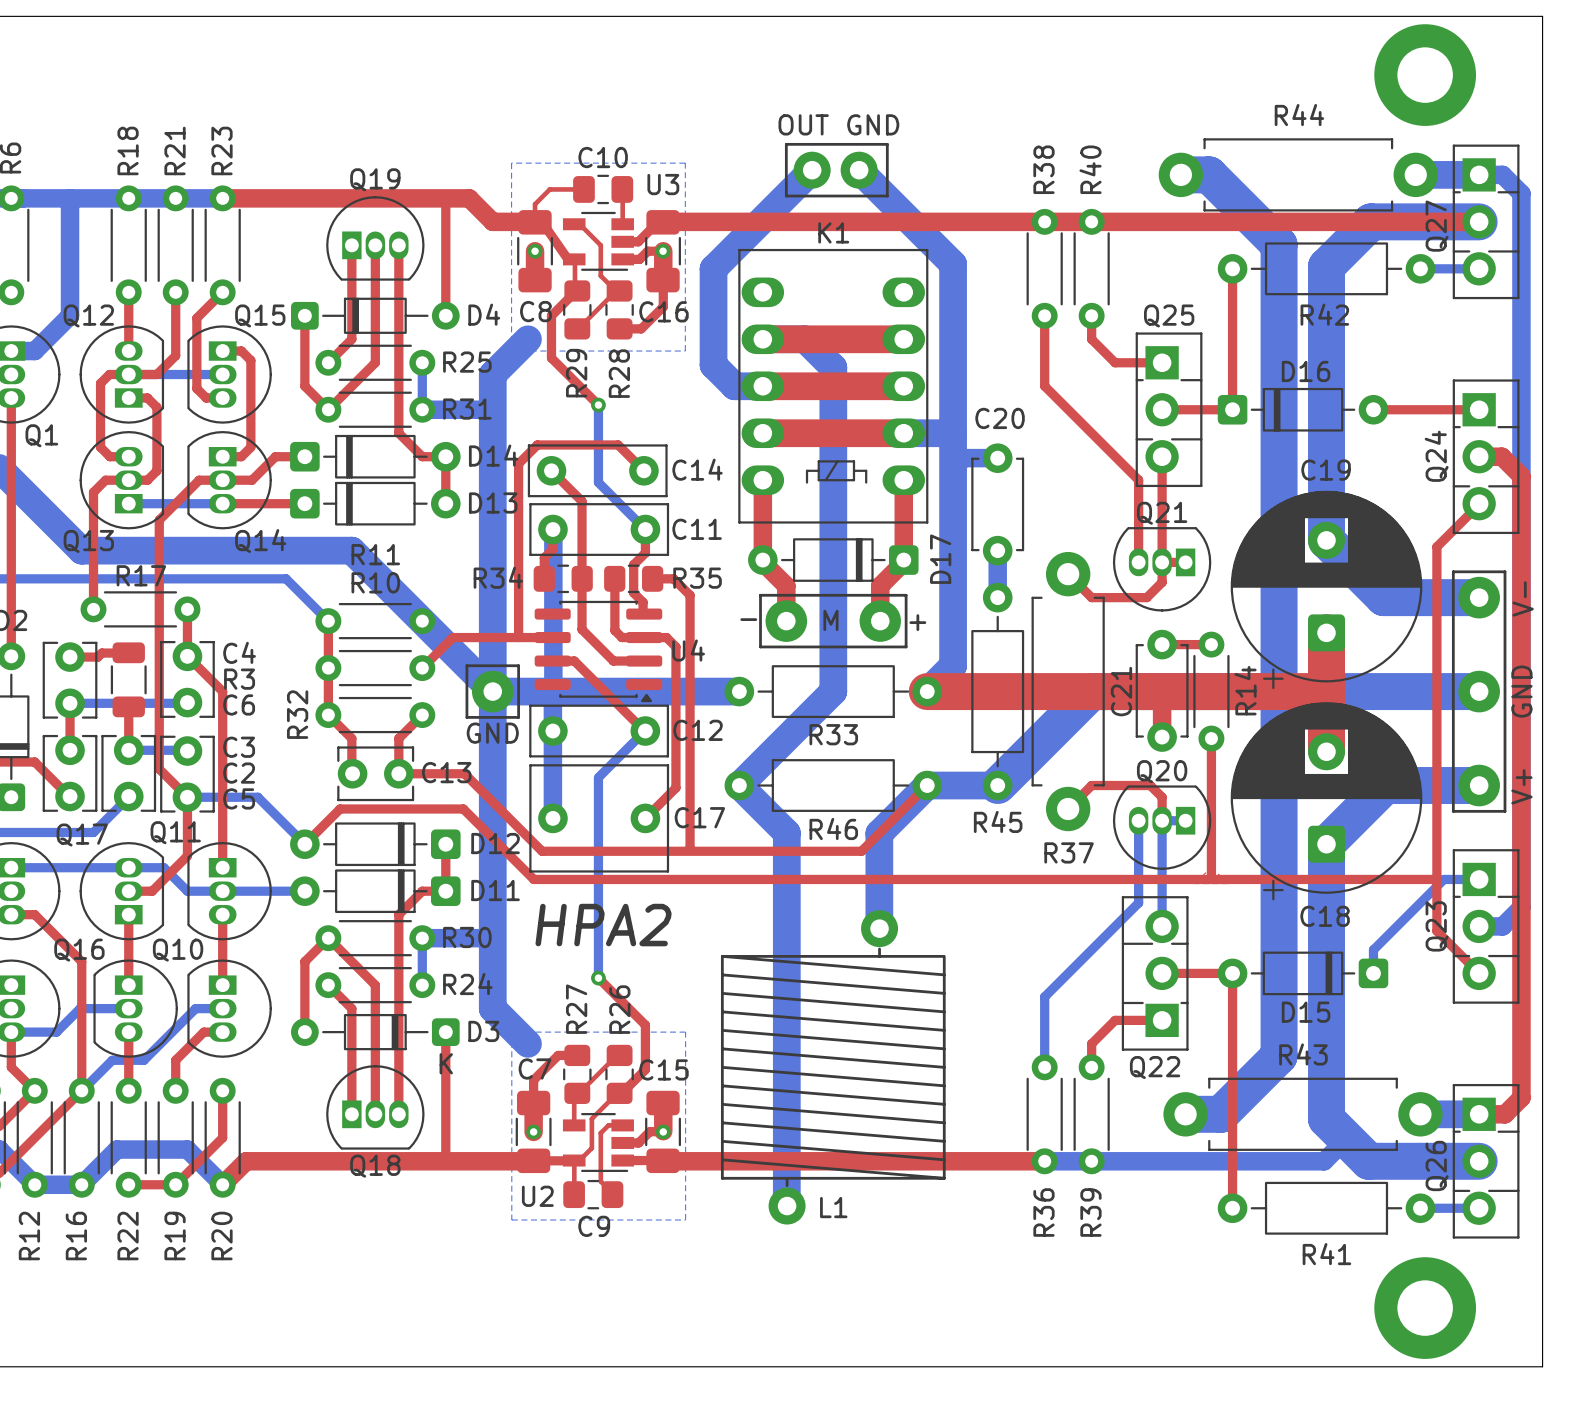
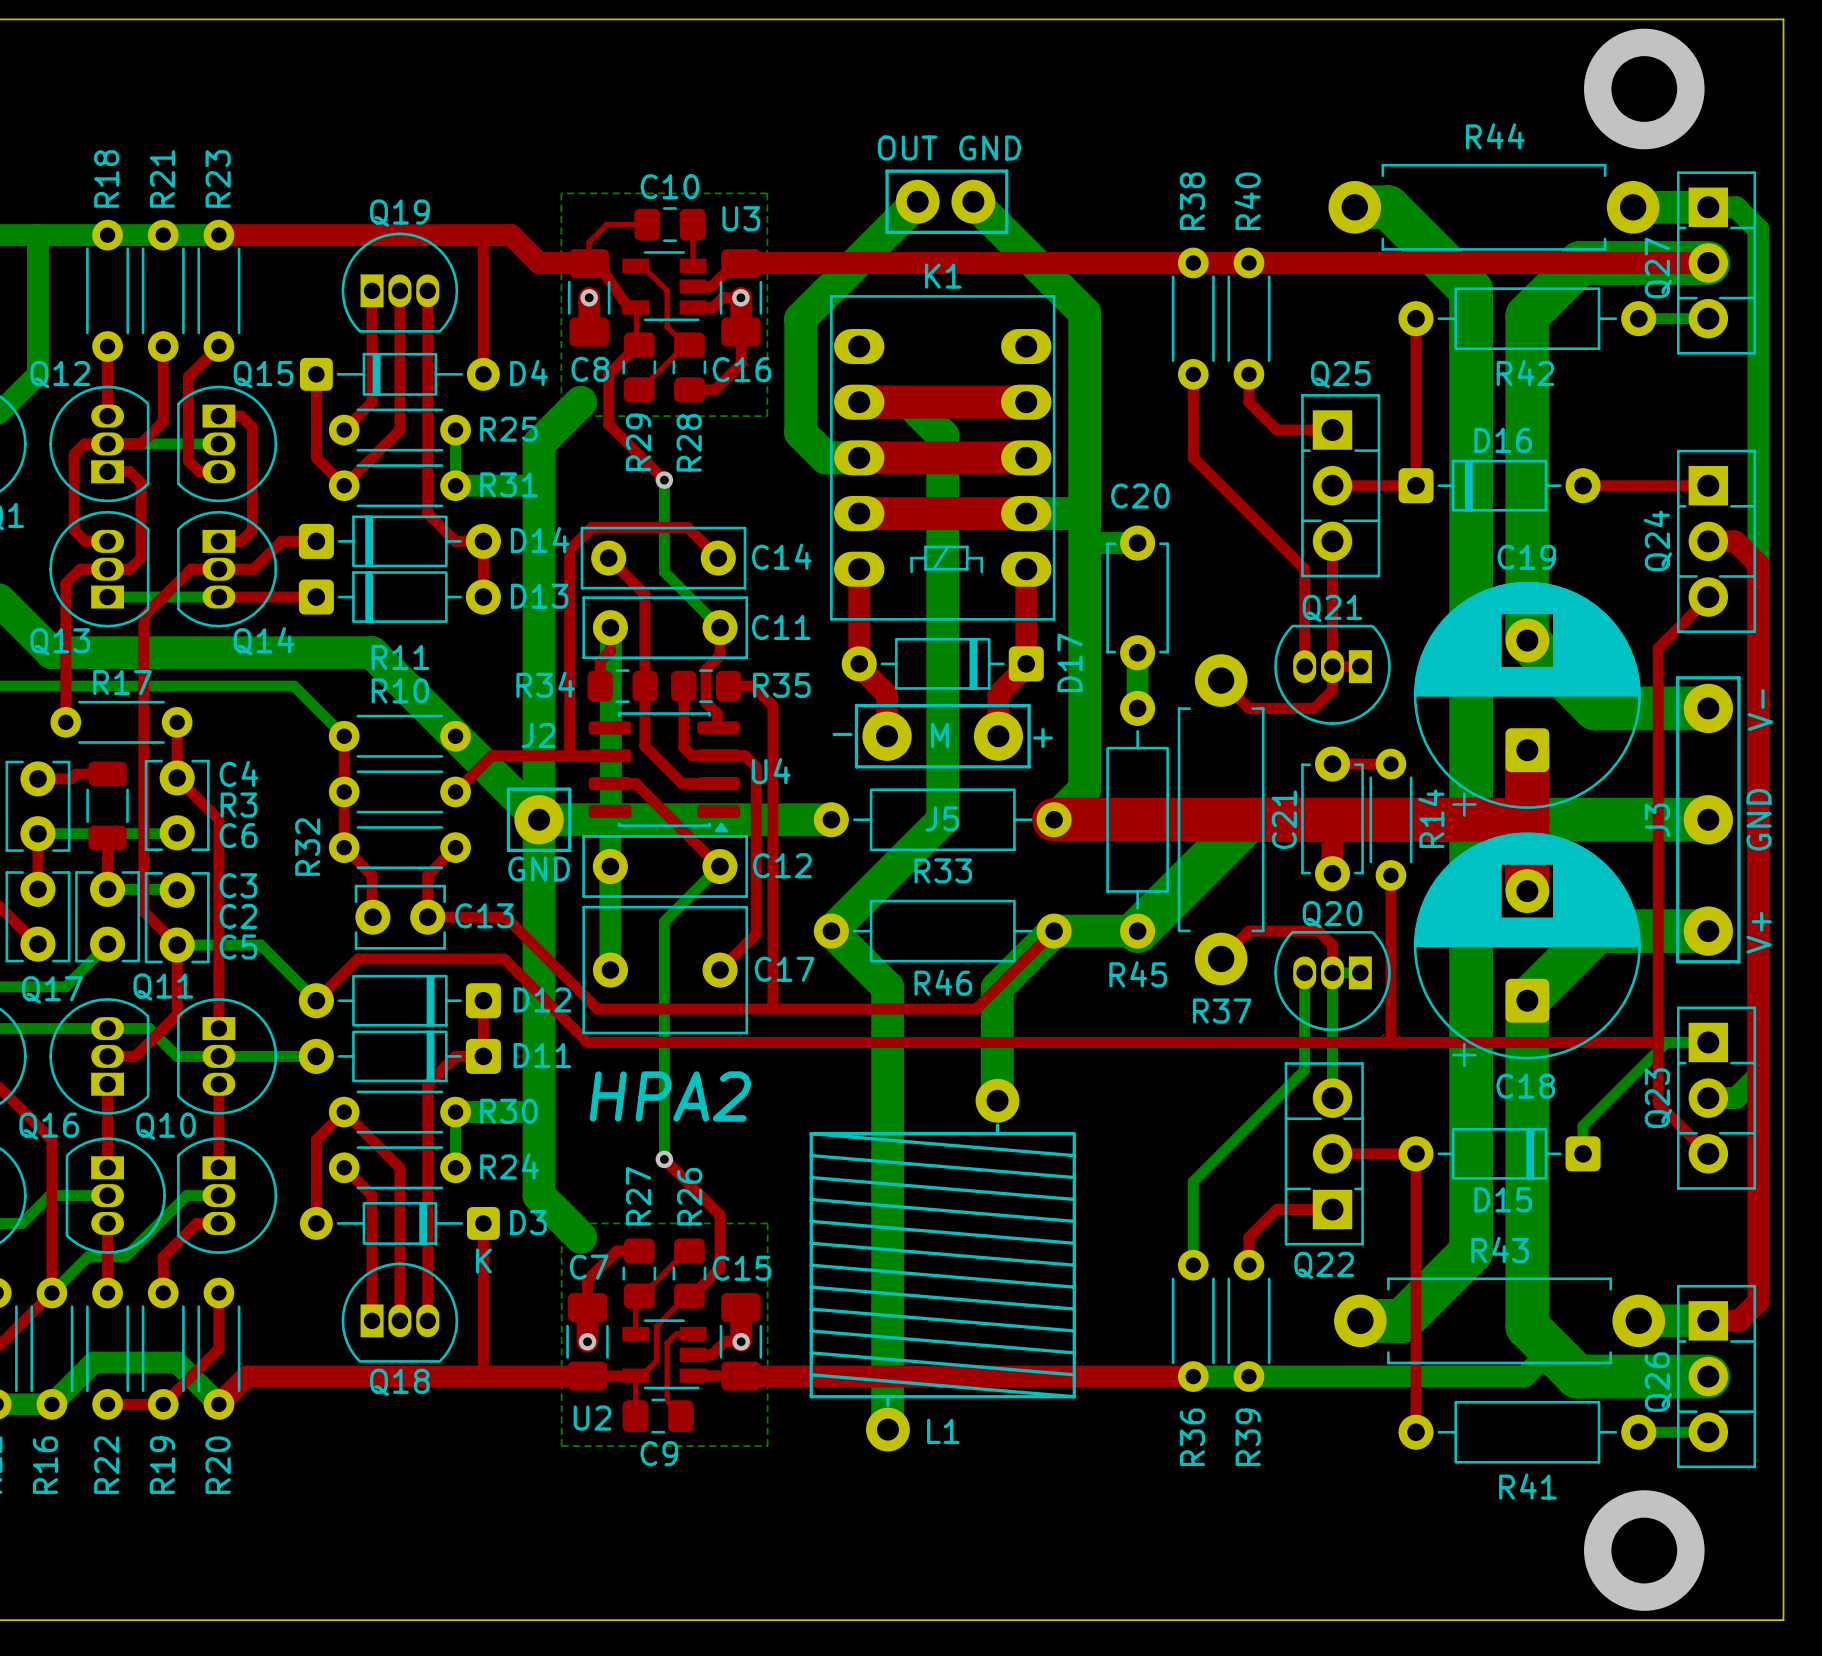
J2 name: none -> J2 (538, 735)
J5 name: none -> J5 (942, 818)
J3 name: none -> J3 (1657, 820)

